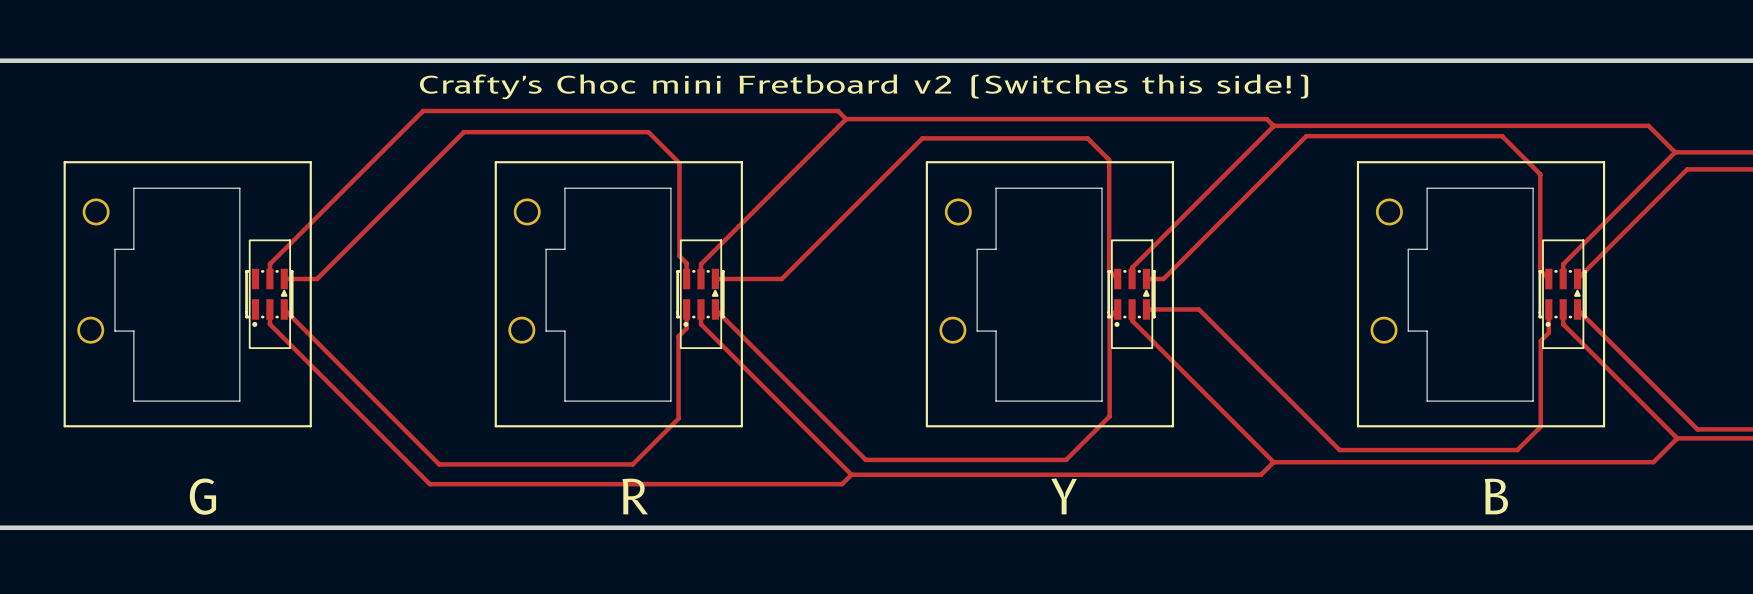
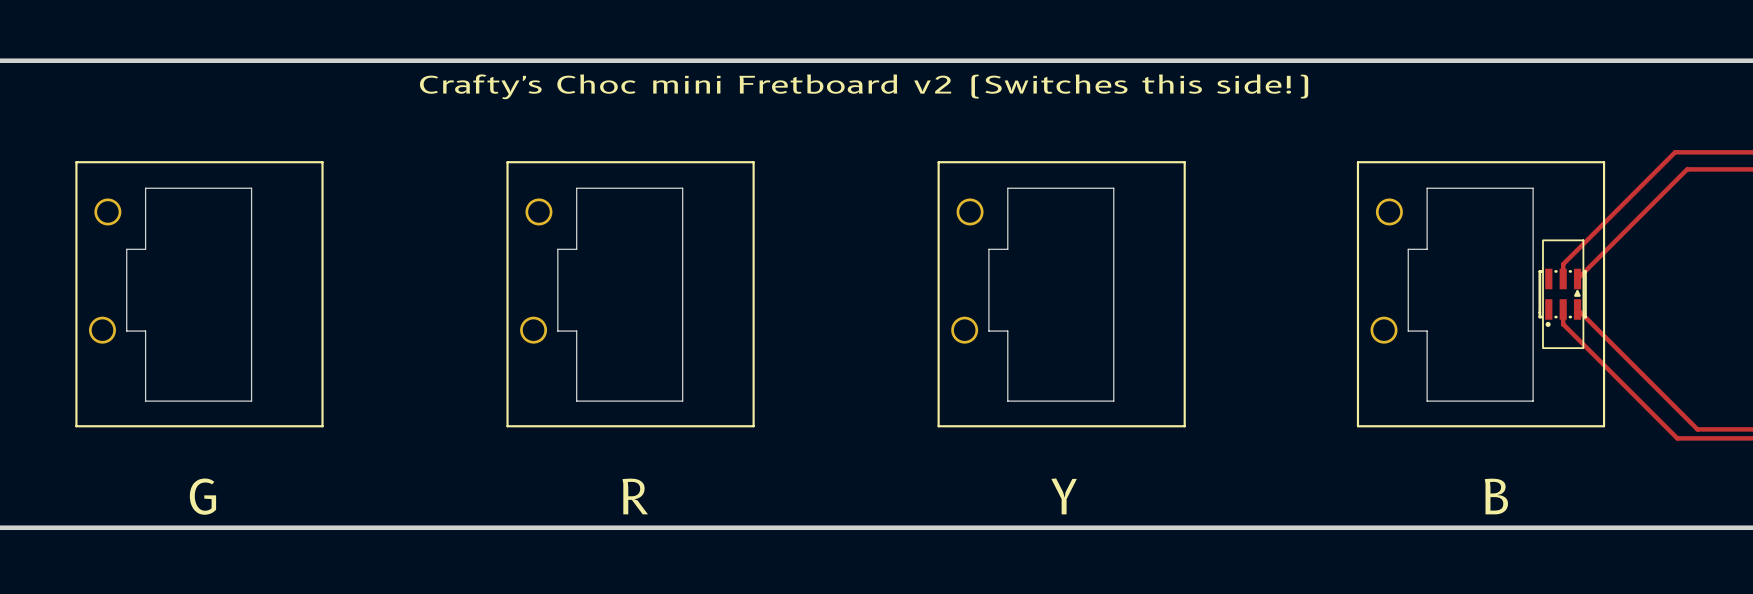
track: (846, 119) (1266, 119) (1273, 126) -> none
track: (846, 119) (838, 111) (423, 111) (269, 264) (269, 279) -> none
track: (846, 119) (701, 264) (701, 279) -> none
track: (1273, 126) (1648, 125) (1675, 152) -> none
track: (1273, 126) (1132, 267) (1132, 279) -> none
part footprint: [63, 161, 312, 428] -> [75, 161, 324, 428]
part footprint: [494, 161, 743, 428] -> [506, 161, 755, 428]
part footprint: [925, 161, 1175, 428] -> [937, 161, 1186, 428]
track: (284, 279) (317, 279) (463, 132) (648, 132) (679, 163) (679, 256) (686, 263) (686, 279) -> none
track: (715, 279) (781, 279) (922, 138) (1087, 138) (1109, 159) (1109, 270) (1117, 279) -> none
track: (1146, 279) (1163, 279) (1306, 136) (1502, 136) (1540, 174) (1540, 270) (1548, 279) -> none
part: (269, 297) -> none
part: (700, 297) -> none
part: (1131, 297) -> none
track: (269, 309) (269, 324) (429, 484) (842, 484) (851, 474) -> none
track: (284, 309) (439, 464) (632, 464) (678, 418) (678, 336) (686, 328) (686, 309) -> none
track: (701, 309) (701, 324) (851, 474) -> none
track: (715, 309) (865, 459) (1066, 459) (1109, 416) (1109, 317) (1117, 309) -> none
track: (1132, 309) (1132, 320) (1273, 462) -> none
track: (1146, 309) (1198, 309) (1339, 450) (1517, 450) (1540, 426) (1540, 340) (1548, 332) (1548, 309) -> none
track: (1677, 438) (1653, 462) (1273, 462) -> none
track: (1273, 462) (1261, 474) (851, 474) -> none

